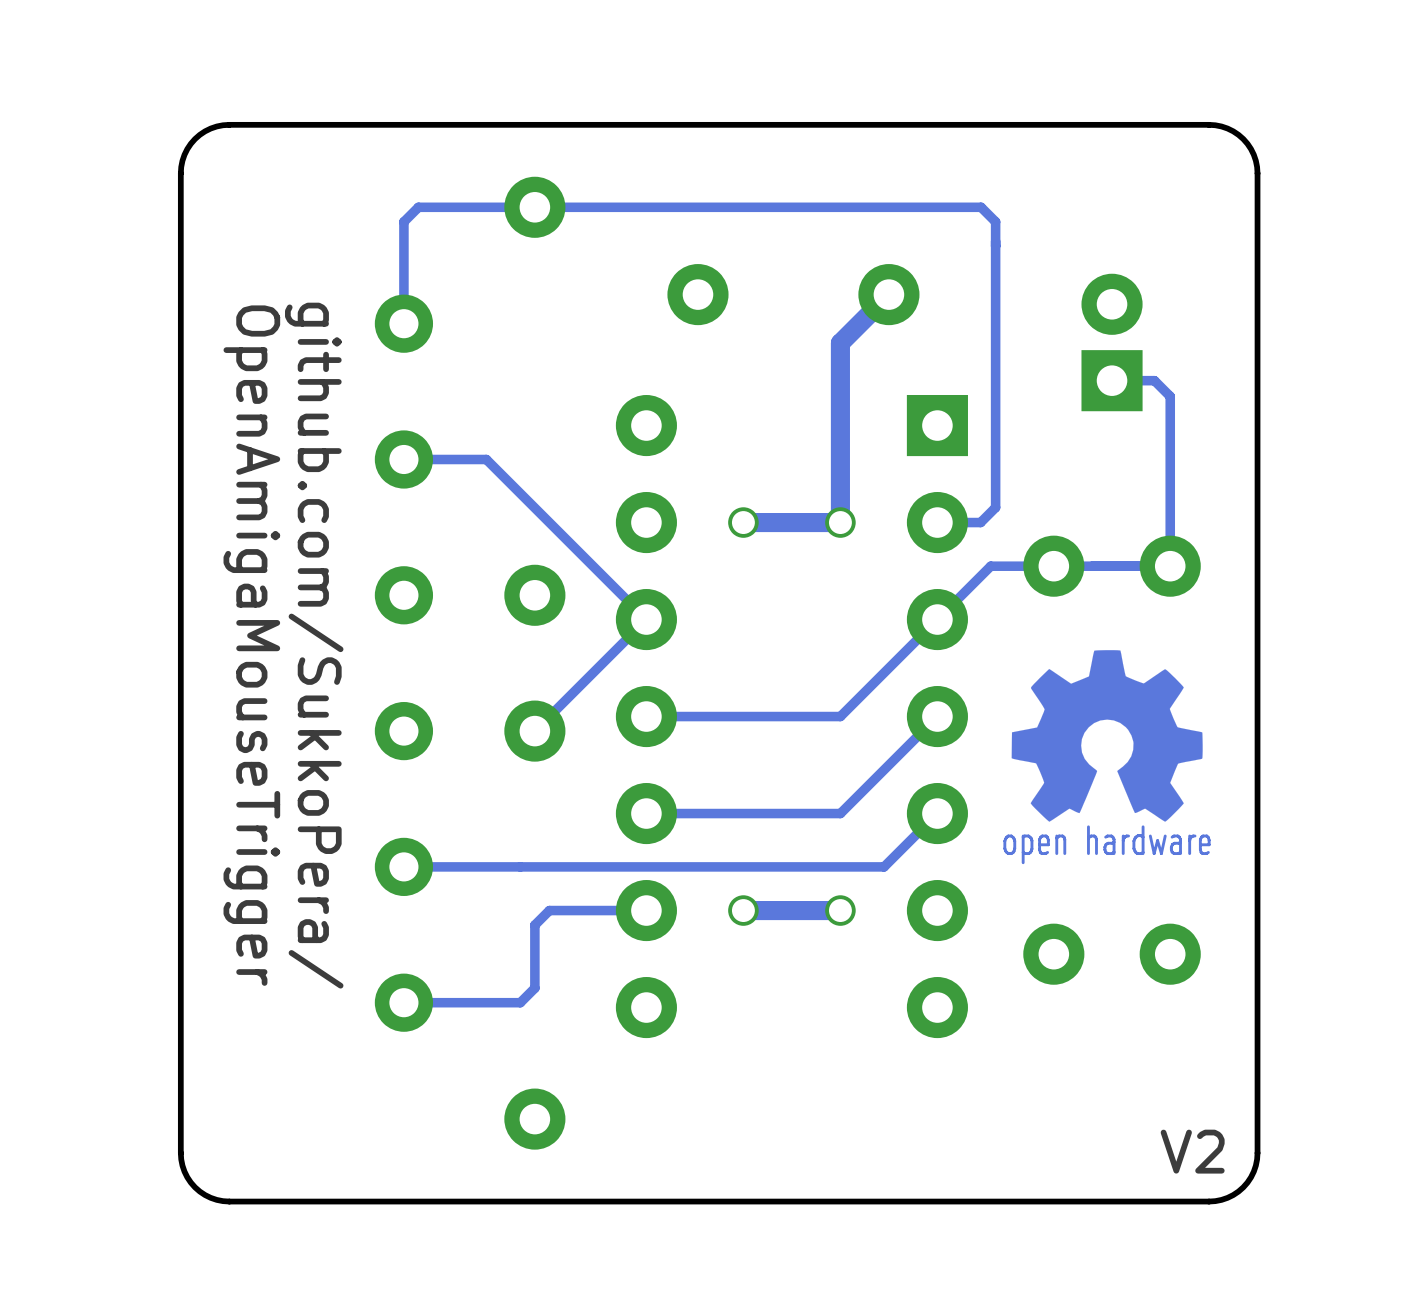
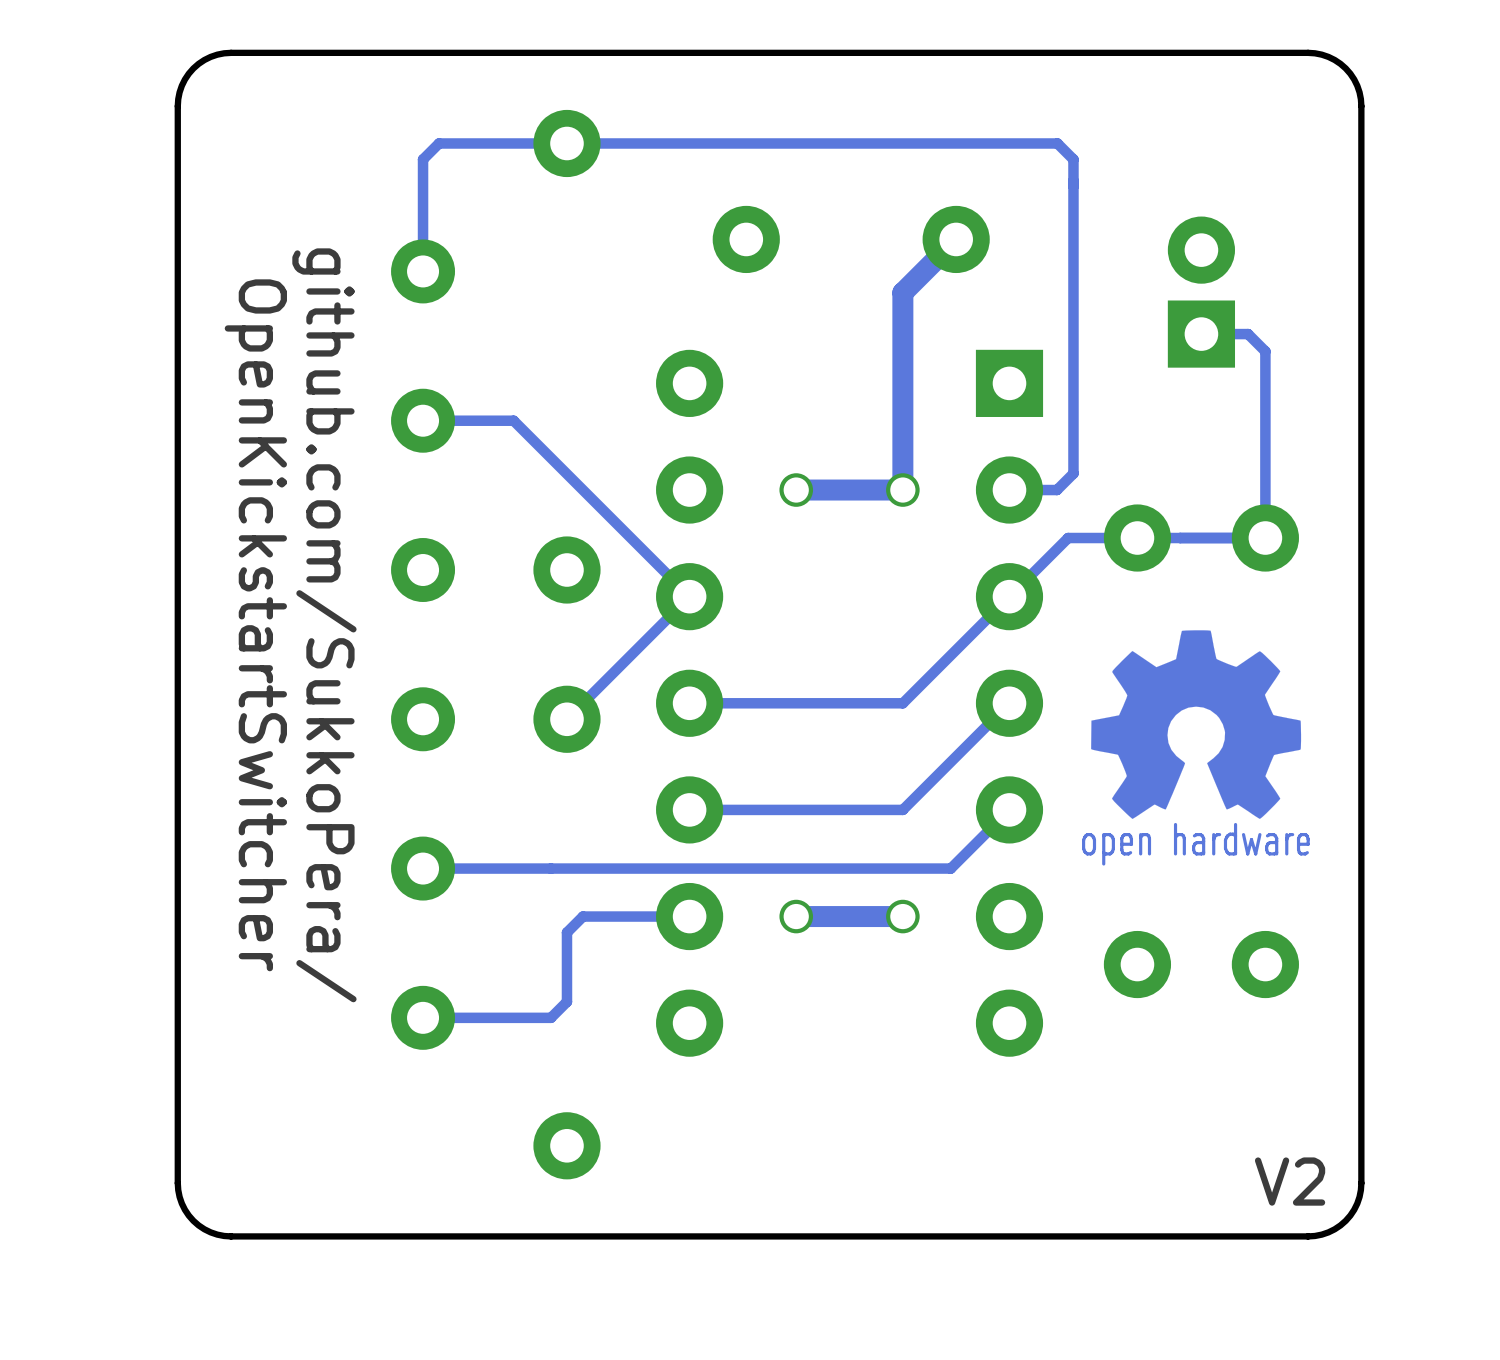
text: OpenAmigaMouseTrigger (251, 645) -> OpenKickstartSwitcher (255, 625)

